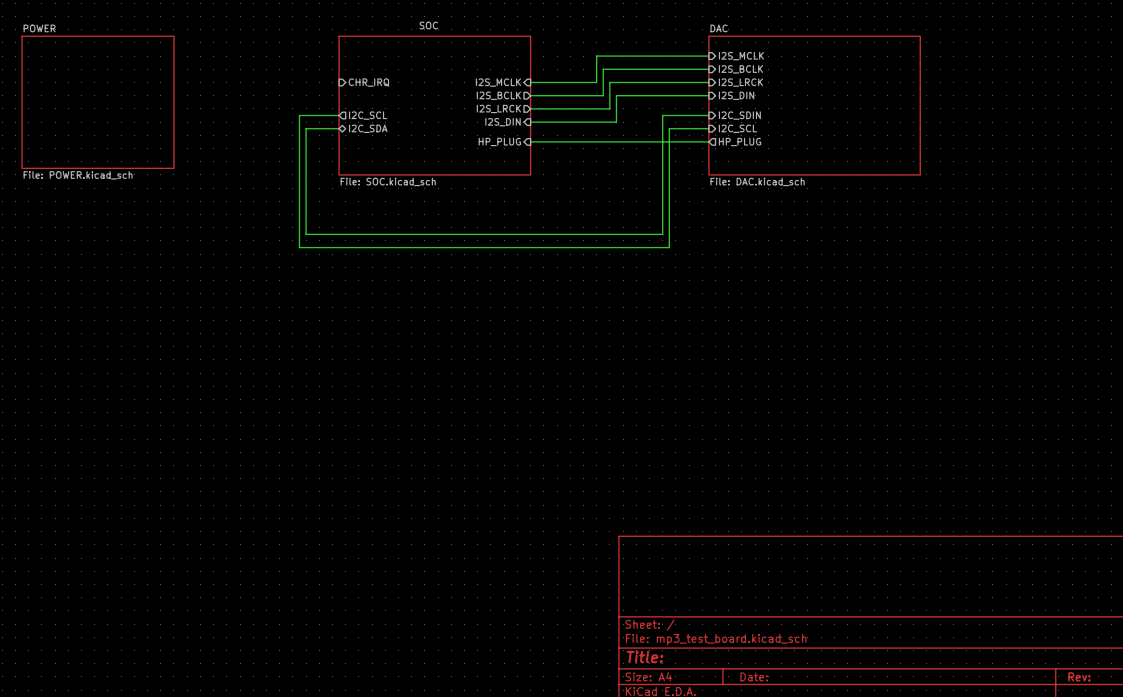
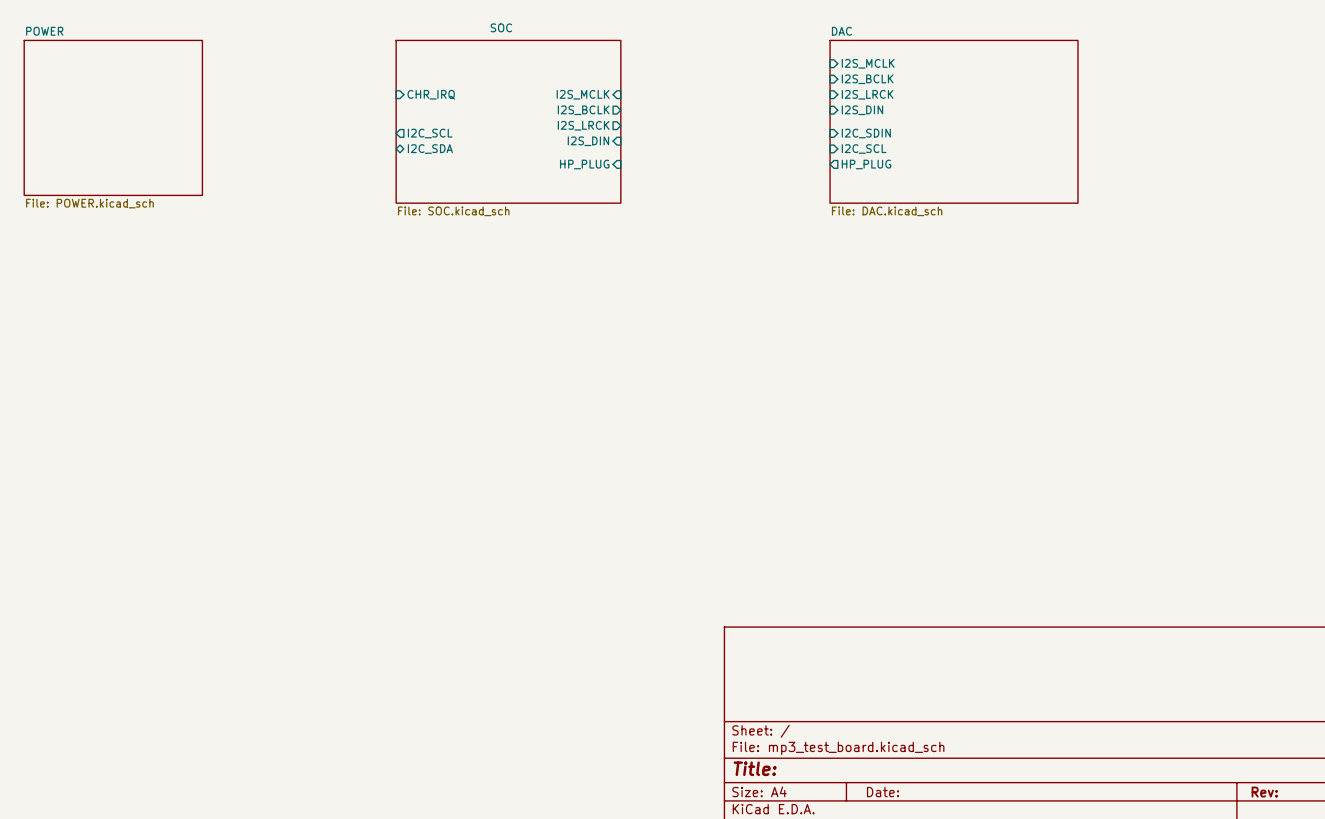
wire: (708, 56) (596, 56) (596, 82) (530, 82) -> none
wire: (708, 69) (603, 69) (603, 95) (530, 95) -> none
wire: (708, 82) (609, 82) (609, 108) (530, 108) -> none
wire: (708, 95) (616, 95) (616, 122) (530, 122) -> none
wire: (339, 115) (299, 115) (299, 247) (669, 247) (669, 128) (708, 128) -> none
wire: (708, 115) (662, 115) (662, 234) (306, 234) (306, 128) (339, 128) -> none
wire: (530, 141) (708, 141) -> none

